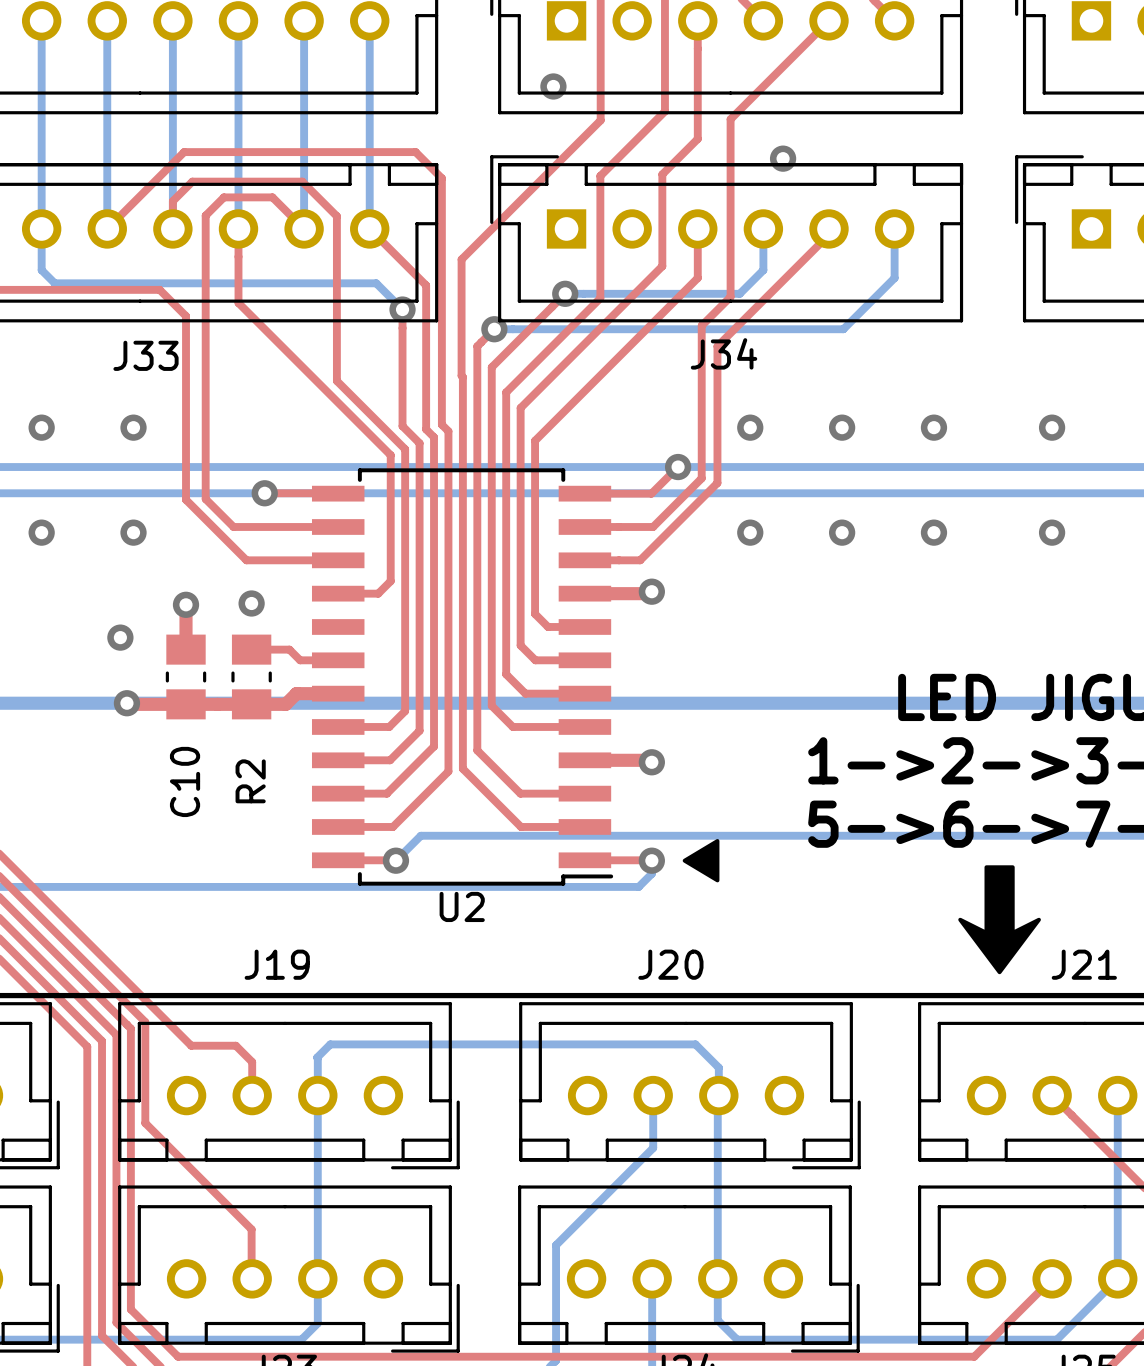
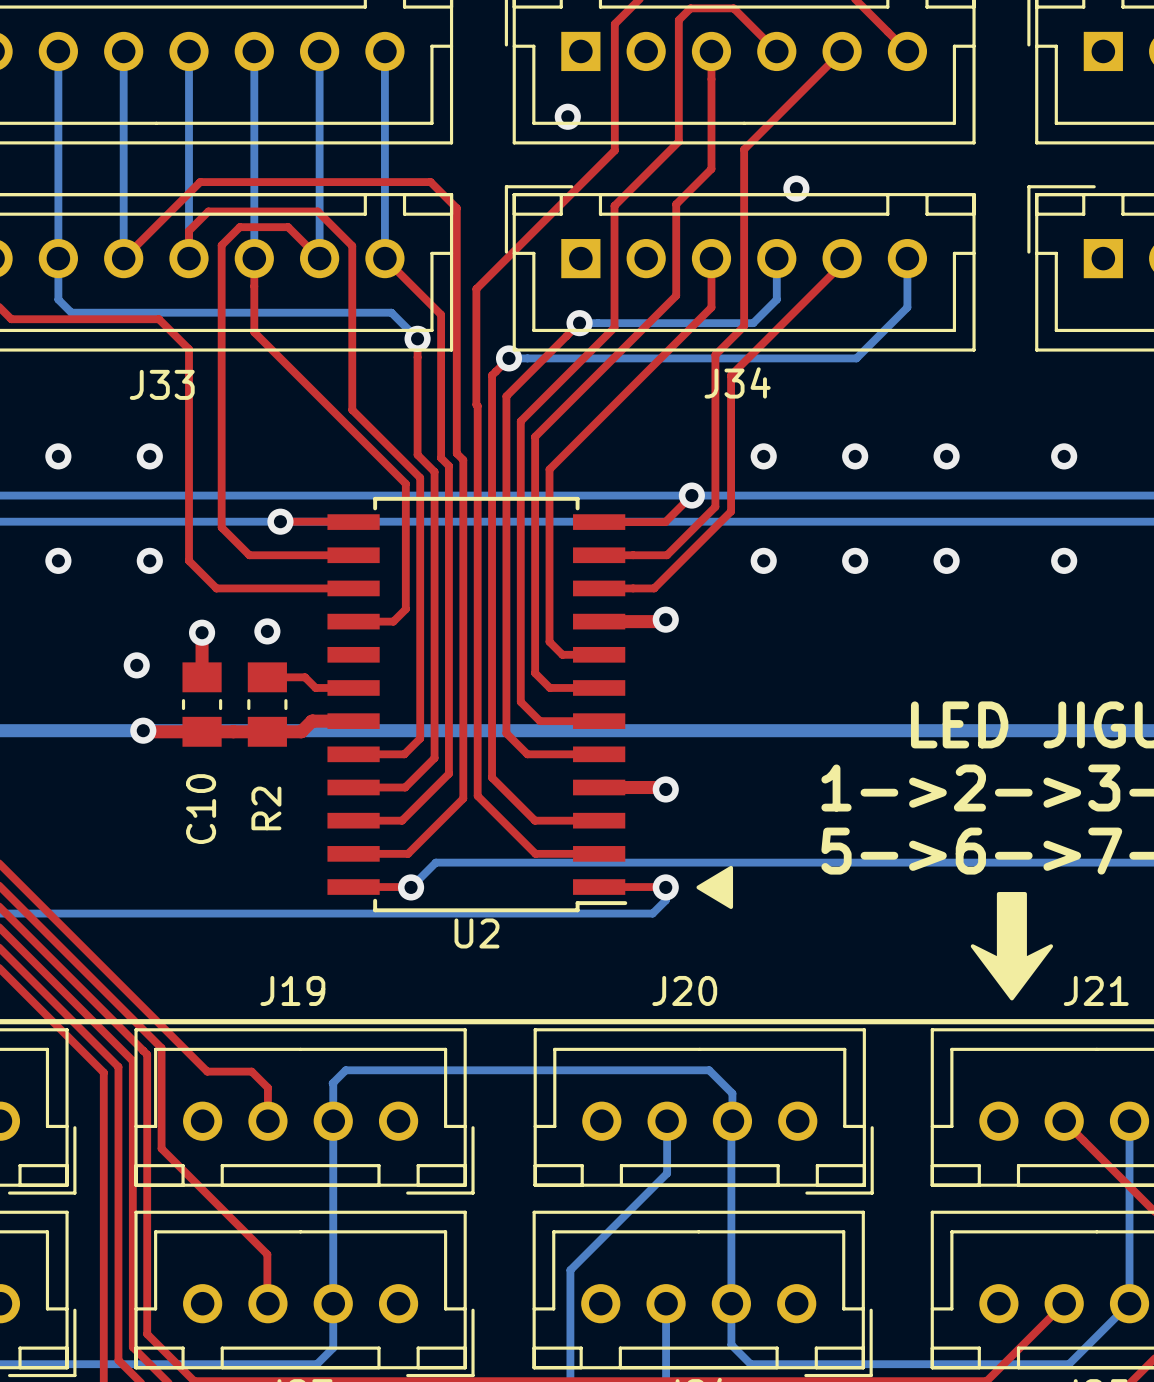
top track: (142, 289) (159, 289) (186, 316) (186, 499) (246, 560) -> (158, 319) (189, 349) (189, 560) (216, 588)
top track: none -> (216, 588) (262, 588)

